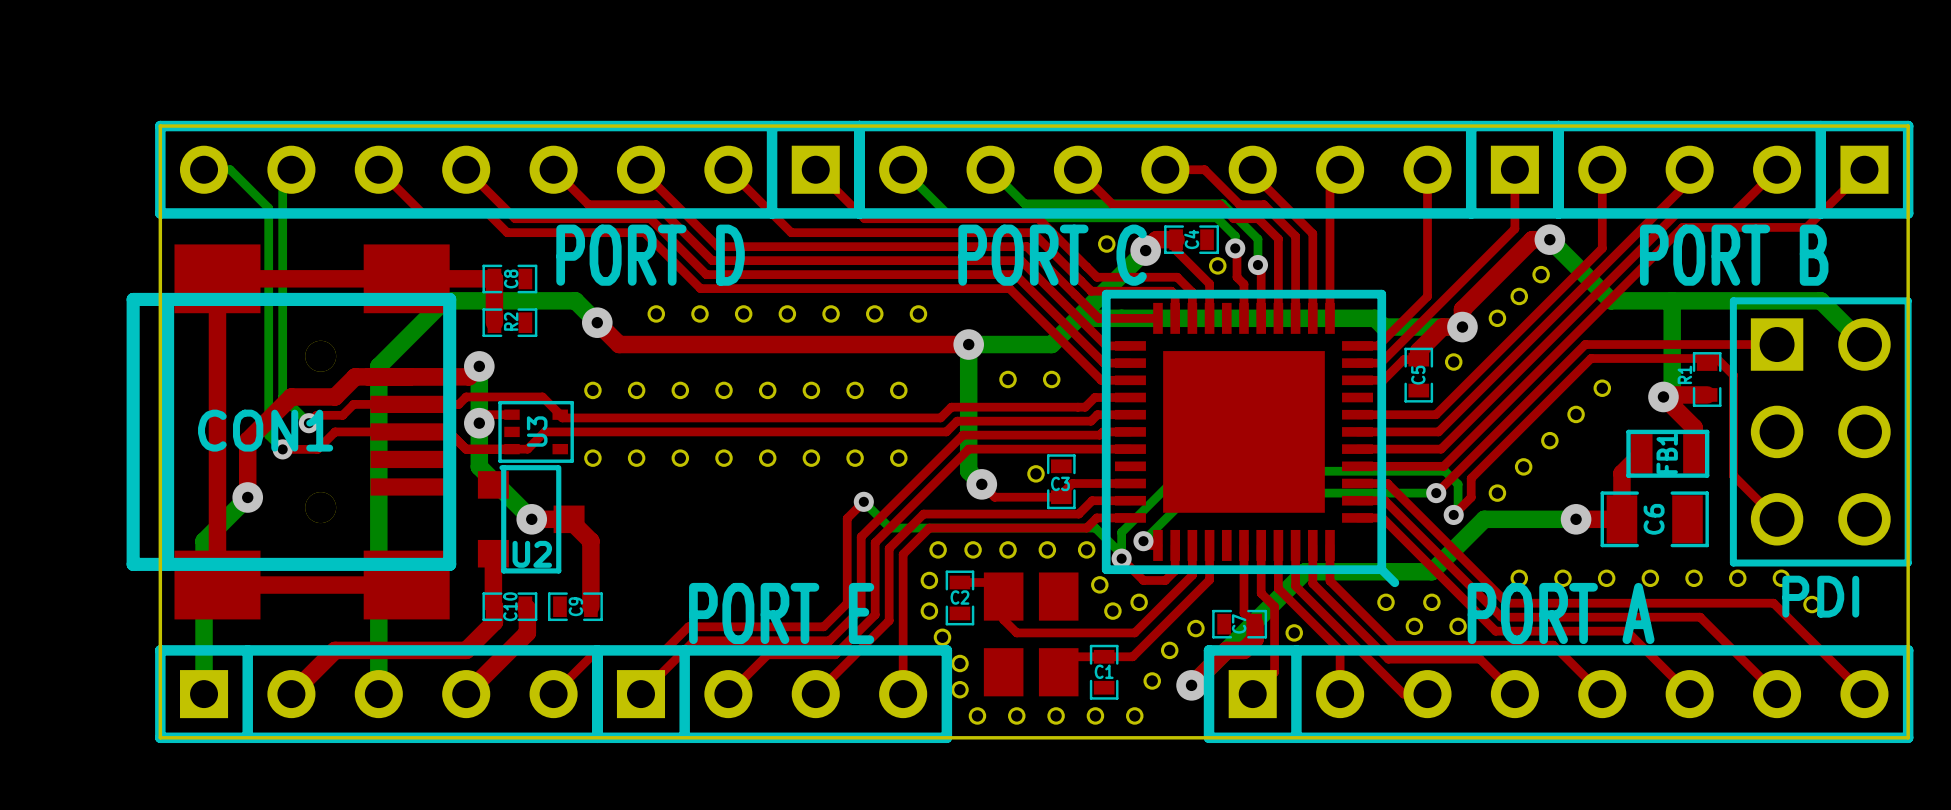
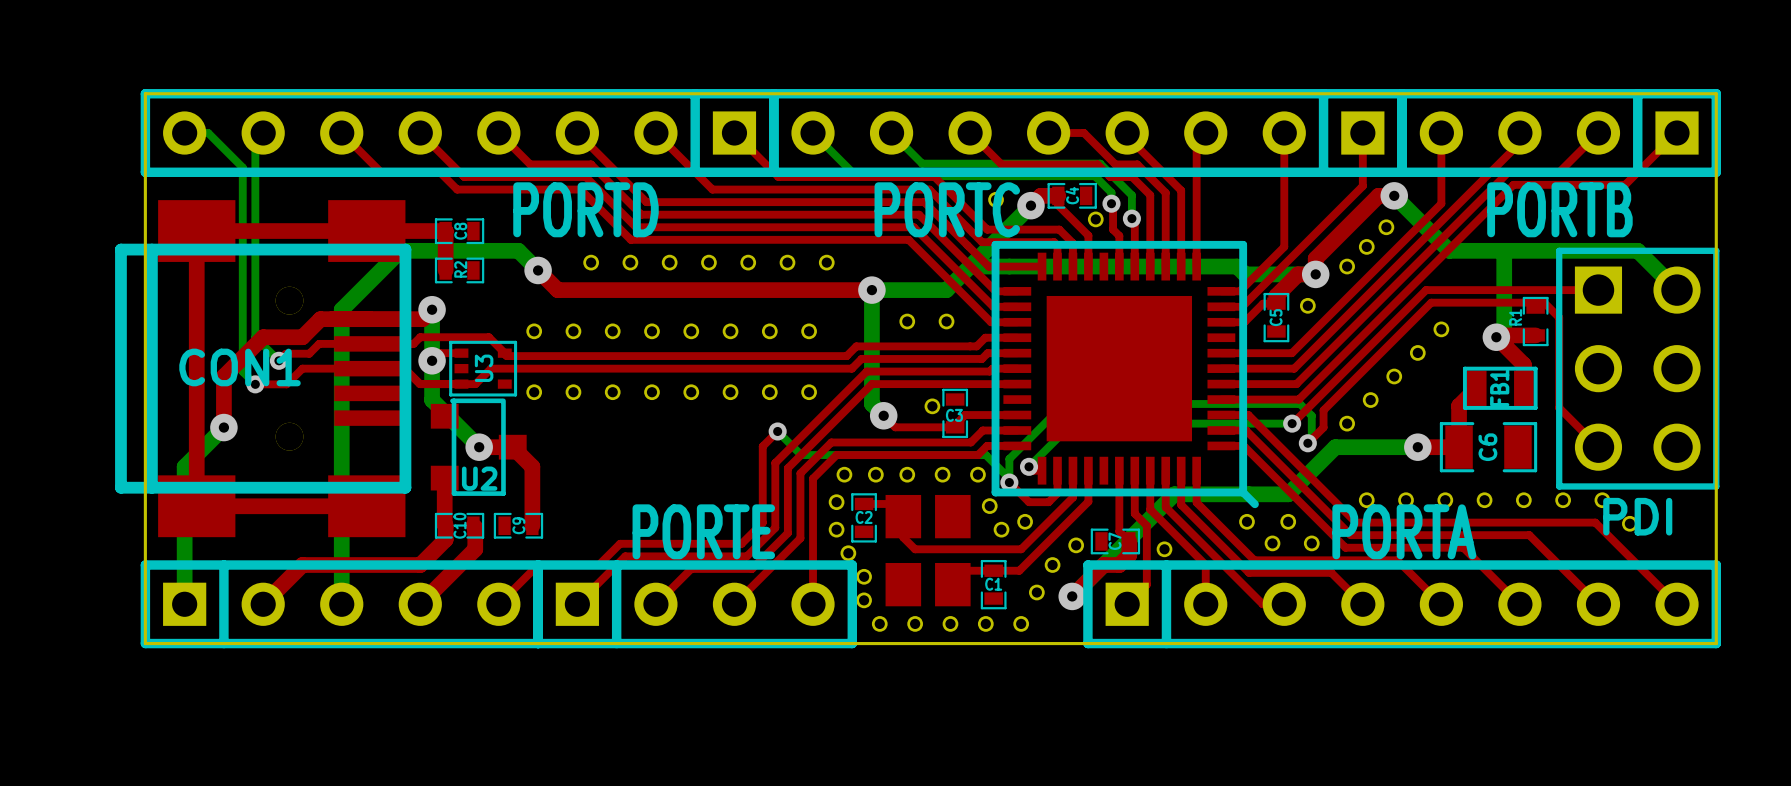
part value: PORT D (650, 255) -> PORTD (585, 209)
part value: PORT C (1052, 255) -> PORTC (947, 209)
part value: PORT B (1734, 255) -> PORTB (1559, 209)
part value: PORT E (781, 613) -> PORTE (703, 531)
part value: PORT A (1561, 613) -> PORTA (1404, 531)

